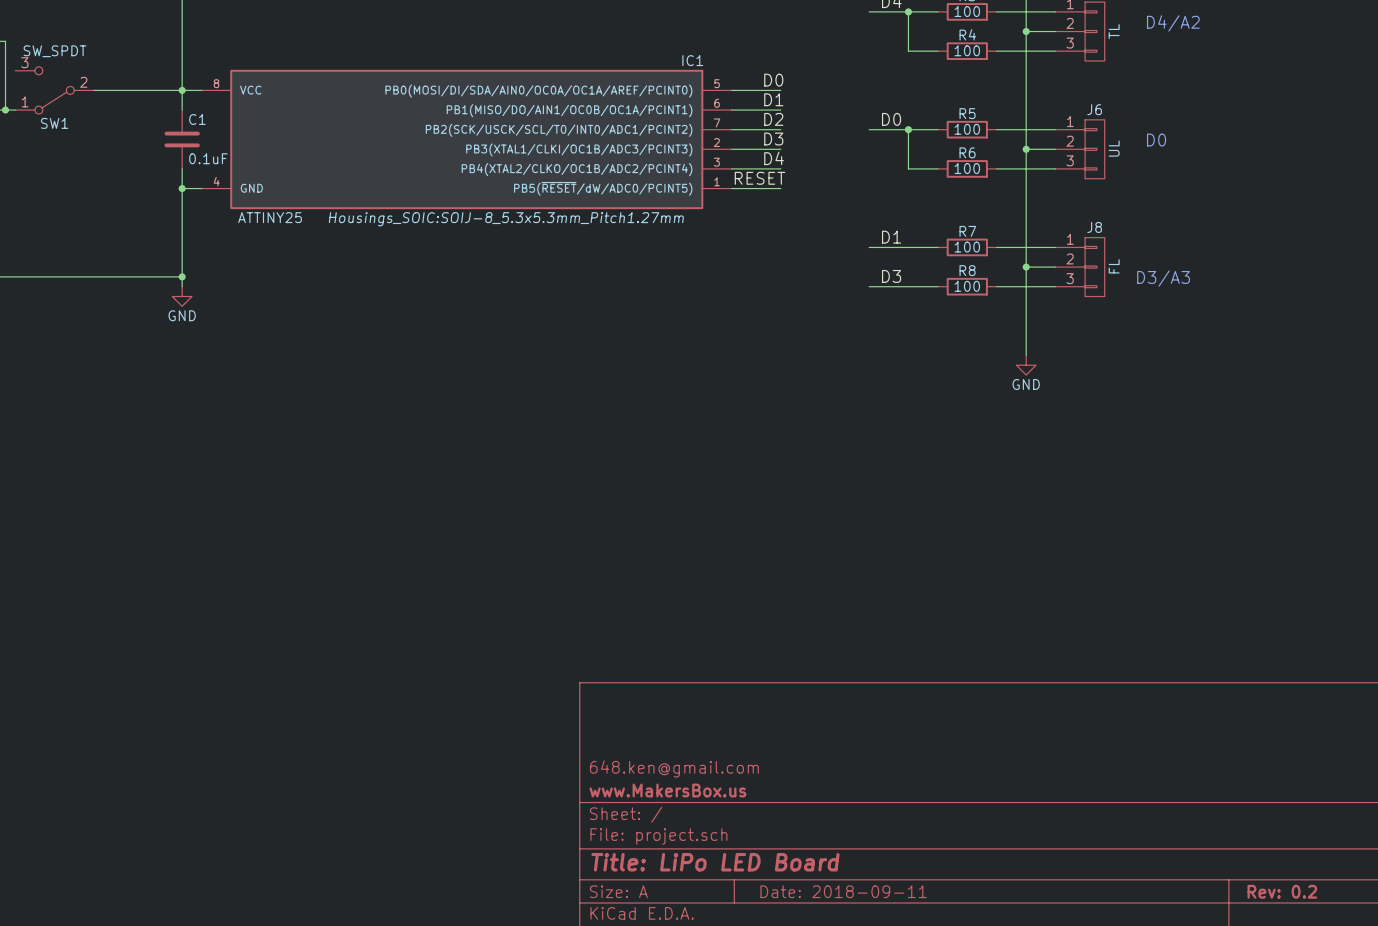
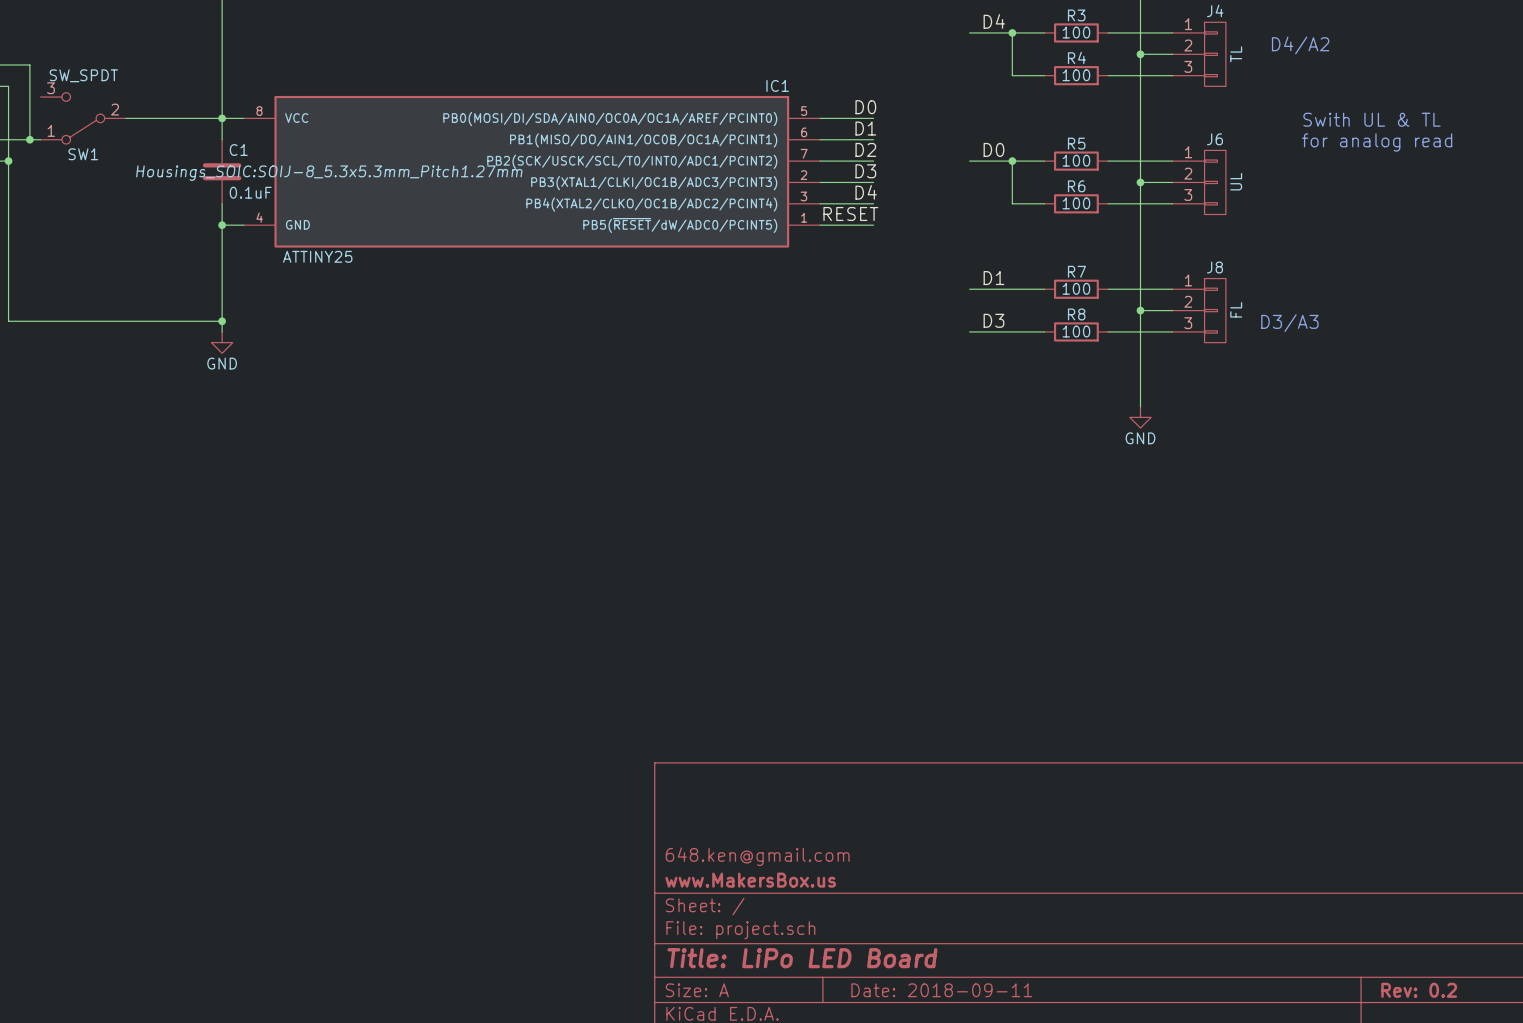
text: none -> Swith UL & TL (1371, 119)
text: none -> for analog read (1377, 142)
text: D0 (1156, 140) -> none
IC1 text position: Housings_SOIC:SOIJ-8_5.3x5.3mm_Pitch1.27mm (506, 219) -> Housings_SOIC:SOIJ-8_5.3x5.3mm_Pitch1.27mm (329, 173)

